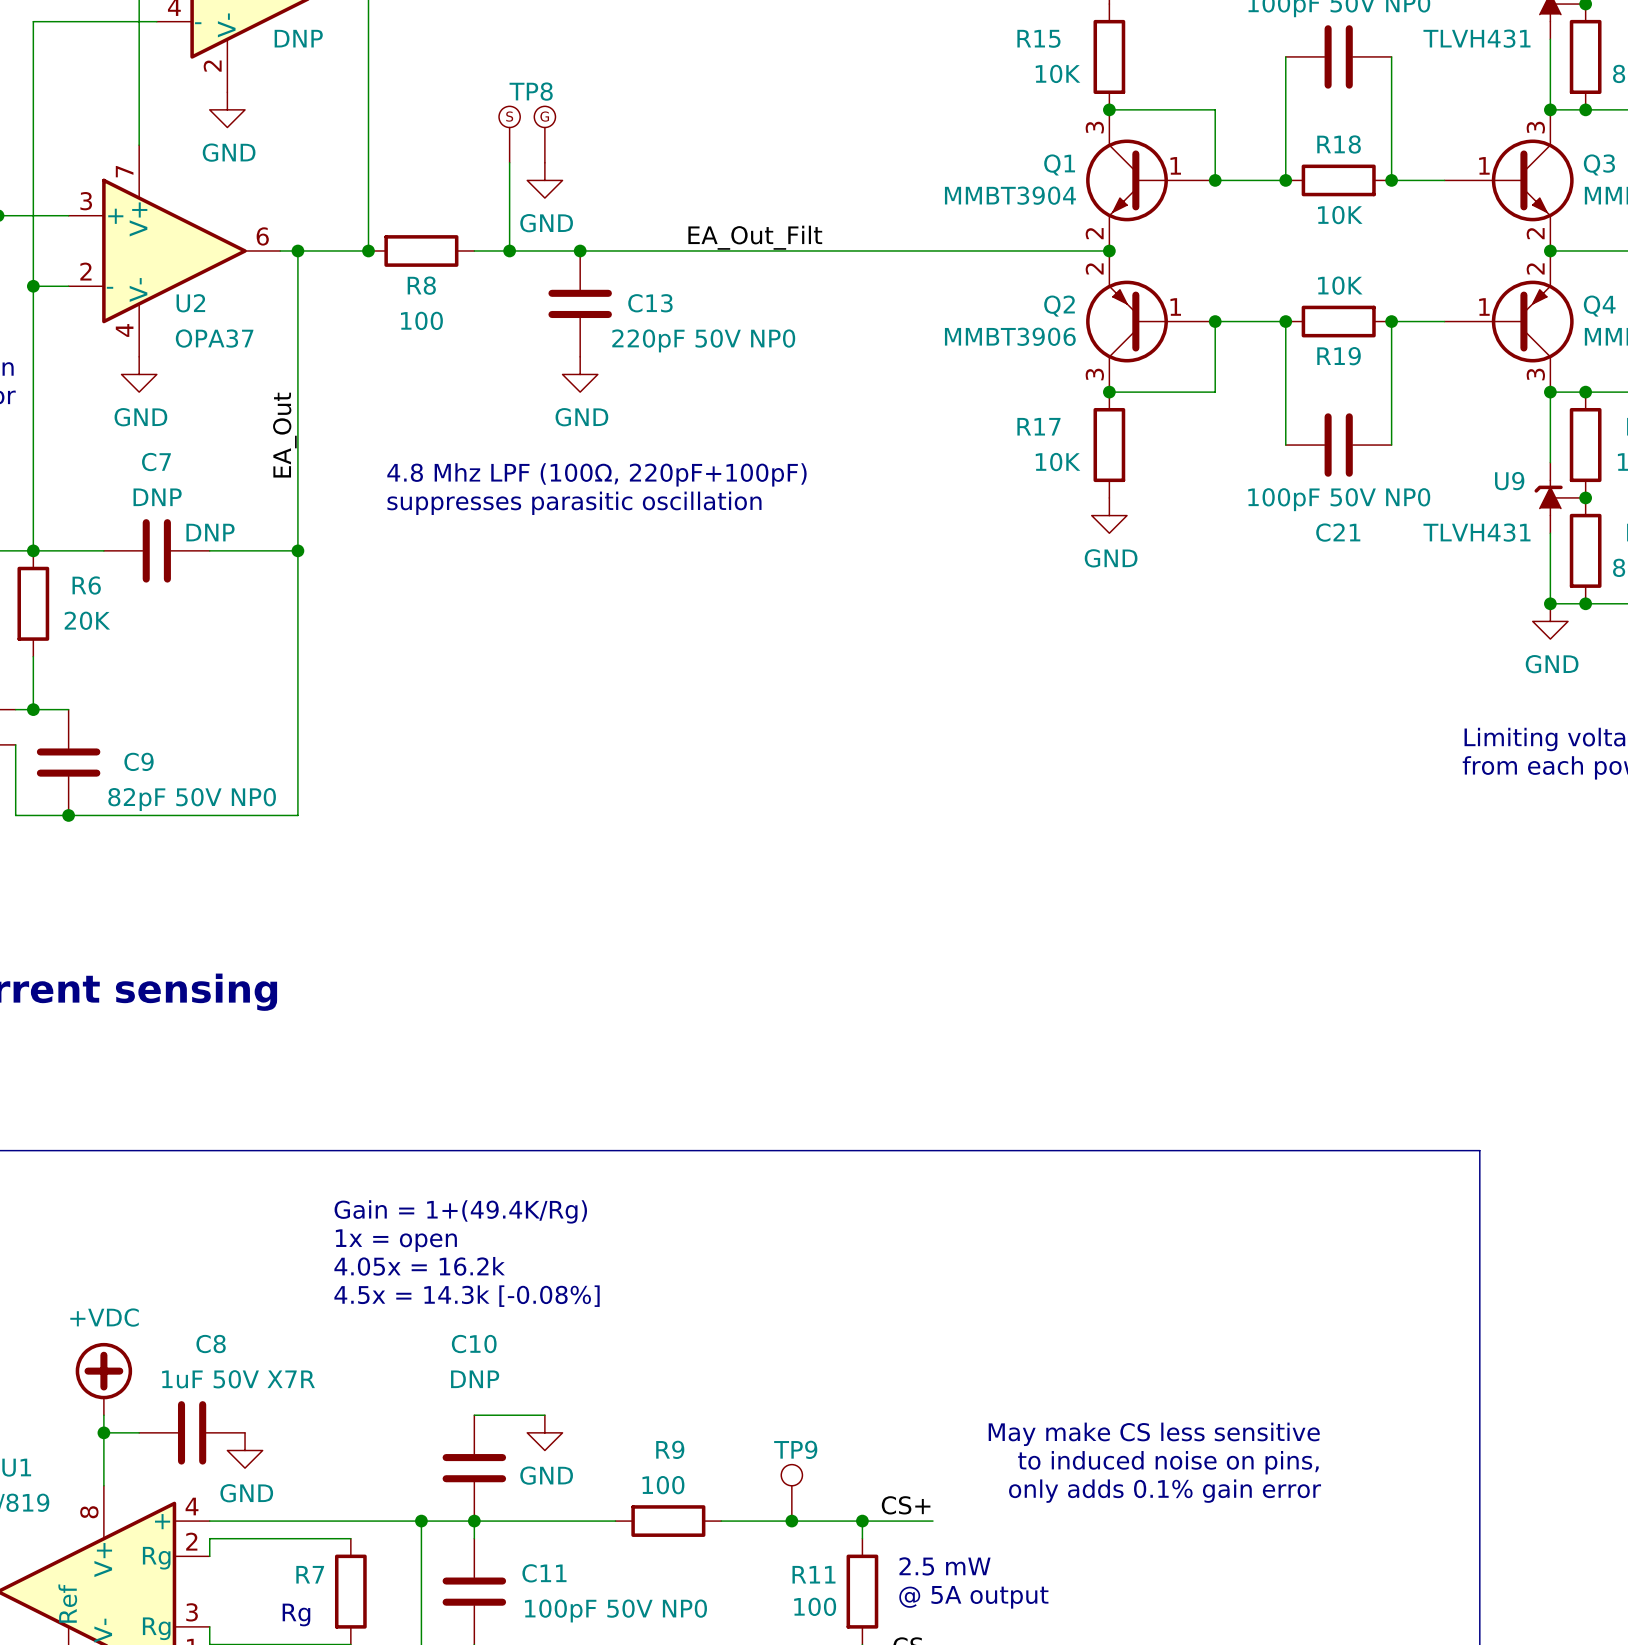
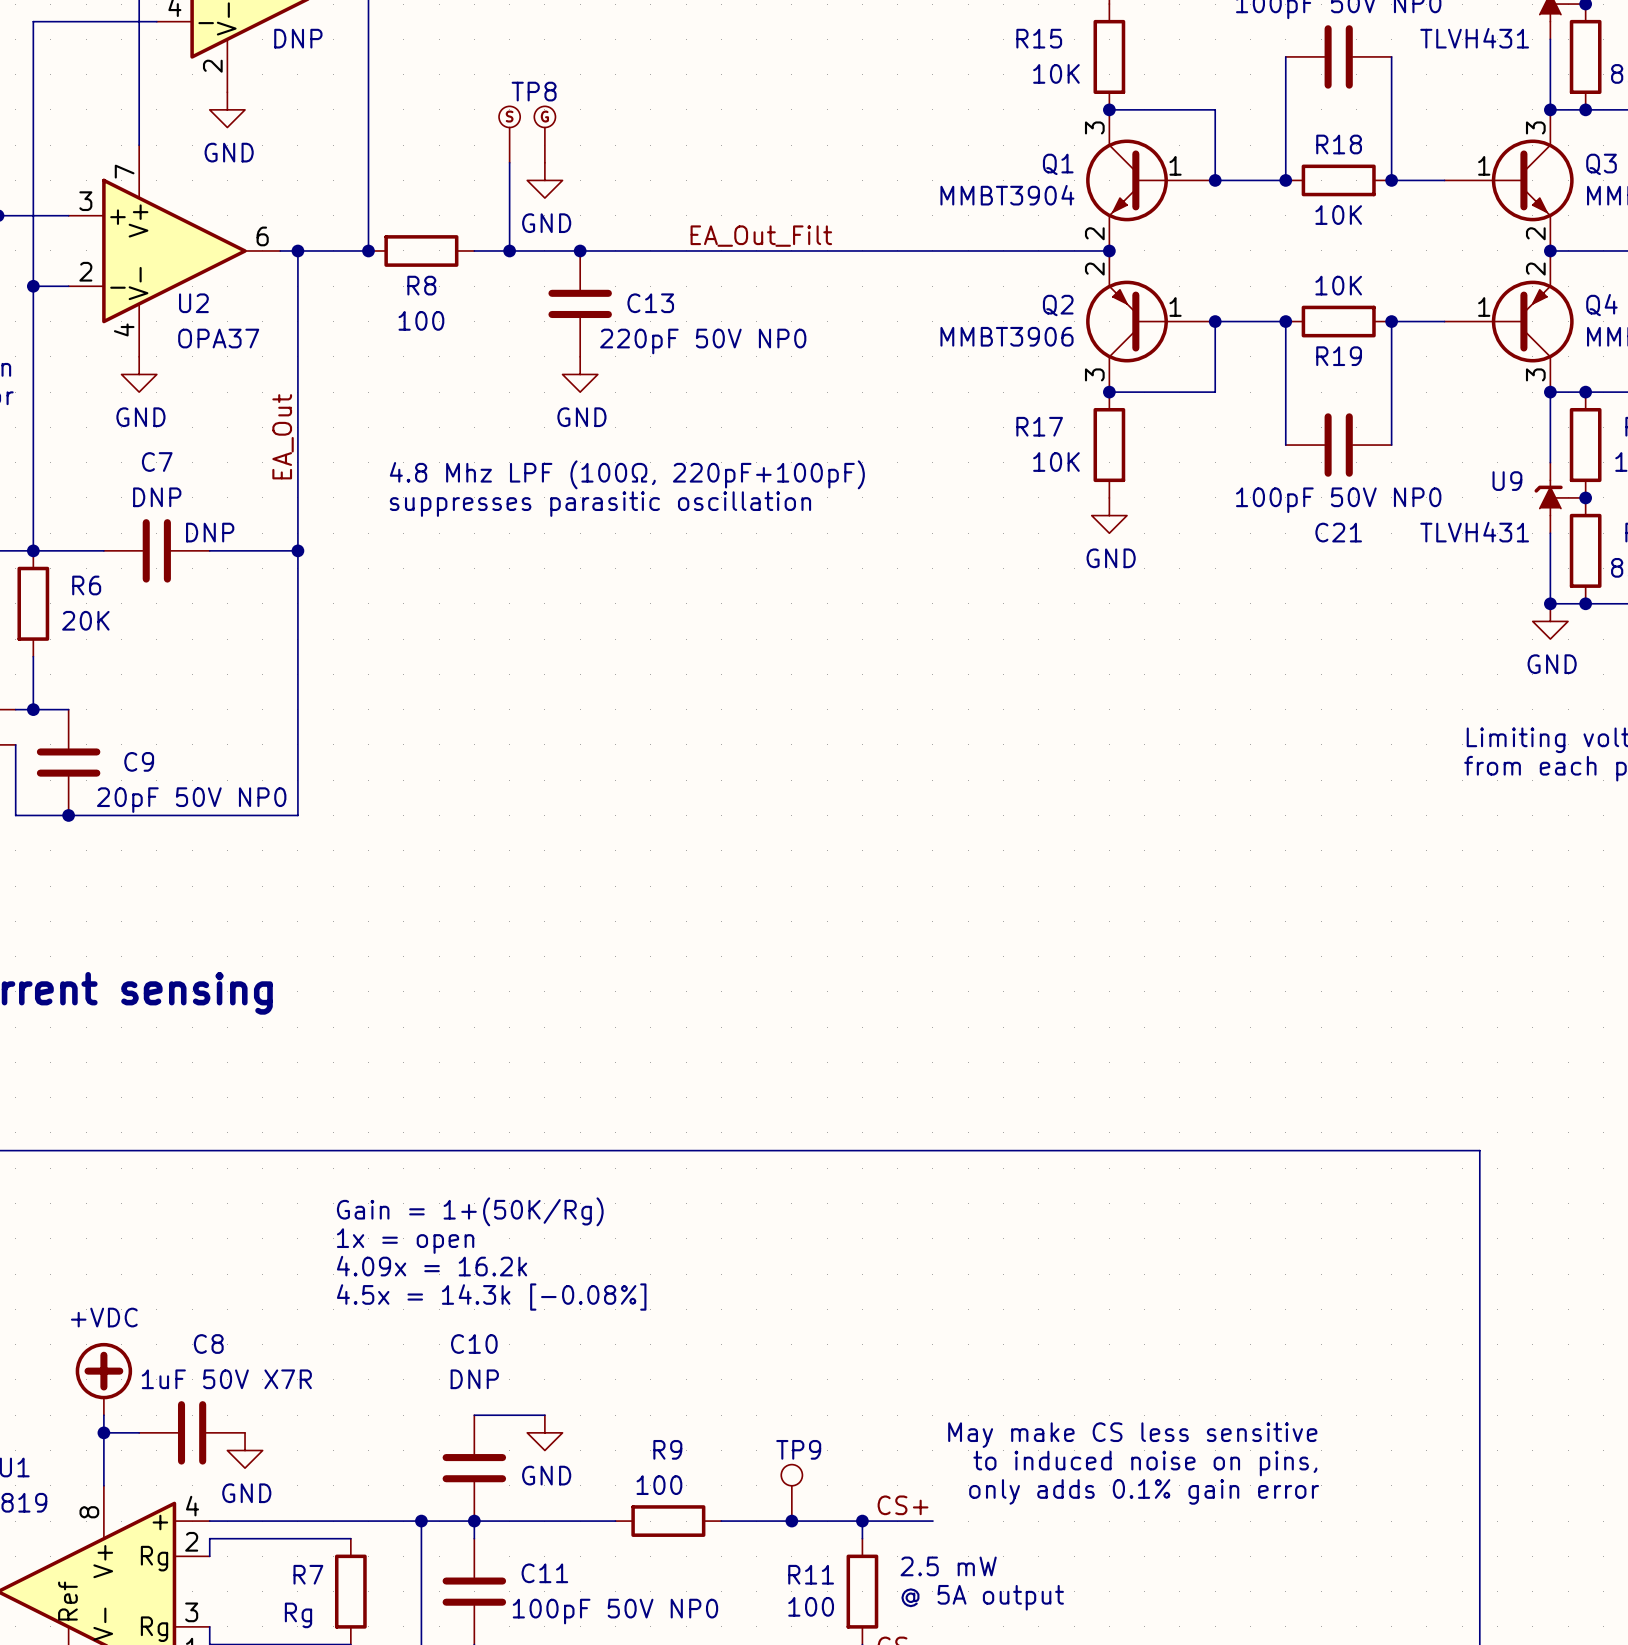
C9 value: 82pF 50V NP0 (192, 799) -> 20pF 50V NP0 (191, 800)
text: Gain = 1+(49.4K/Rg) (460, 1211) -> Gain = 1+(50K/Rg) (470, 1211)
text: 4.05x = 16.2k (419, 1266) -> 4.09x = 16.2k (432, 1266)

